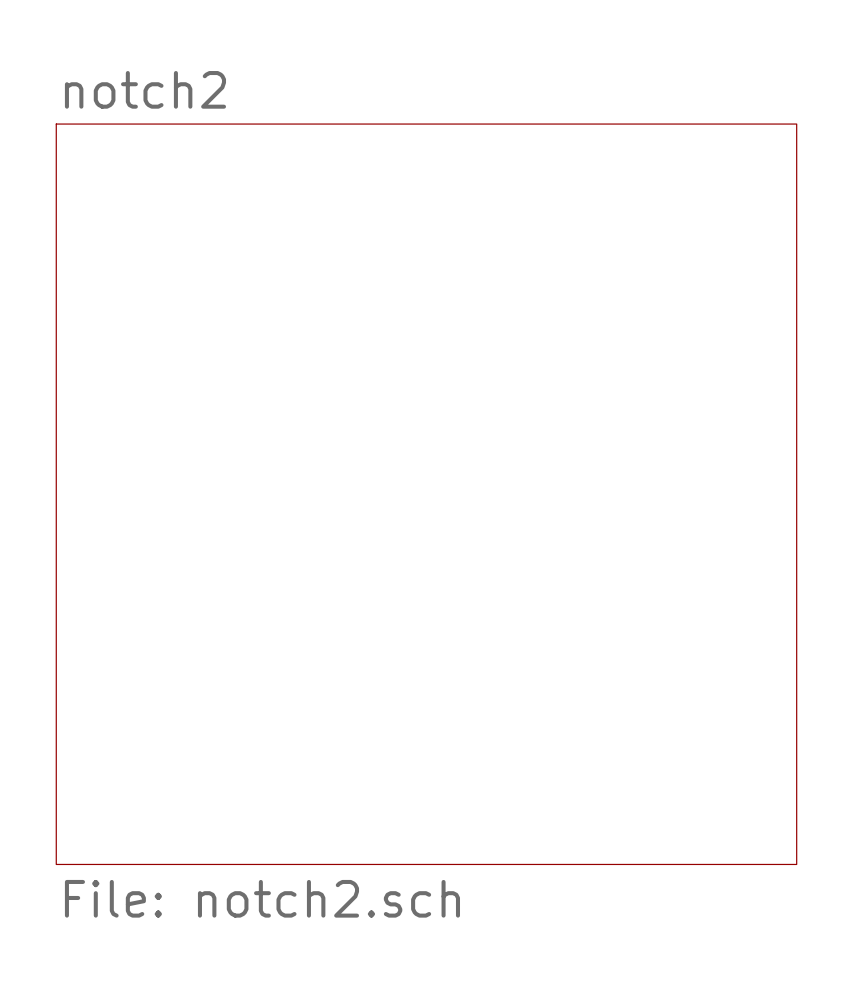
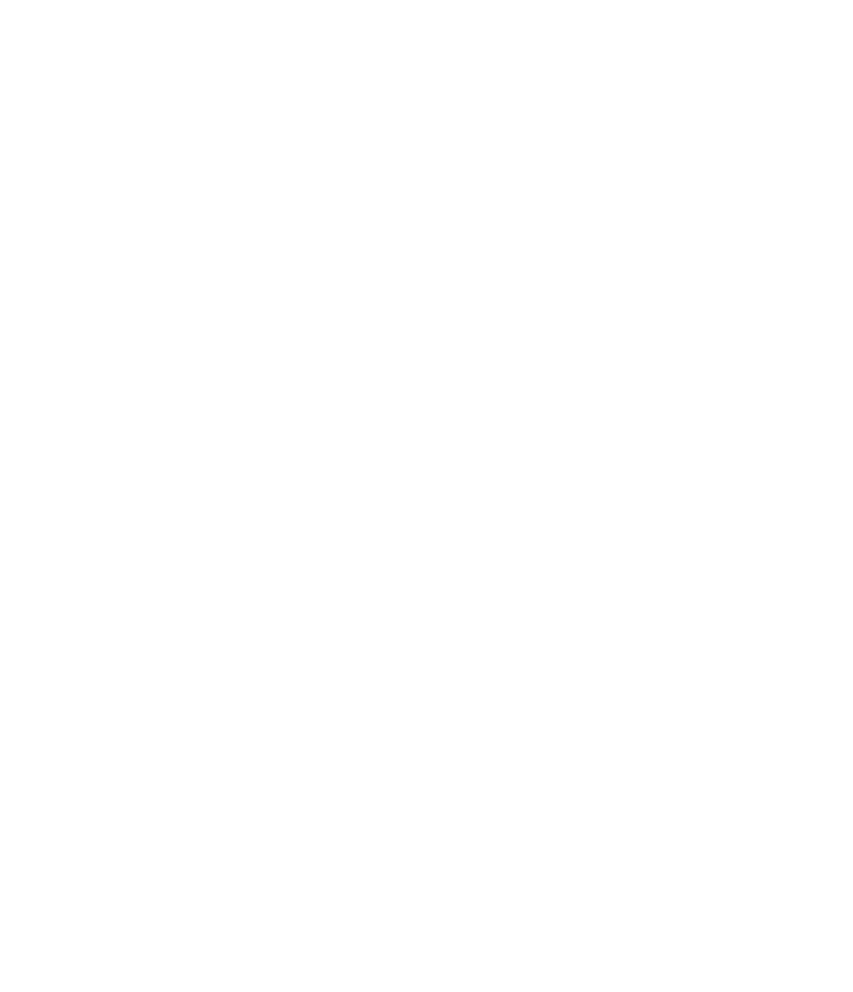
sheet notch2: File: notch2.sch (426, 494) -> none

